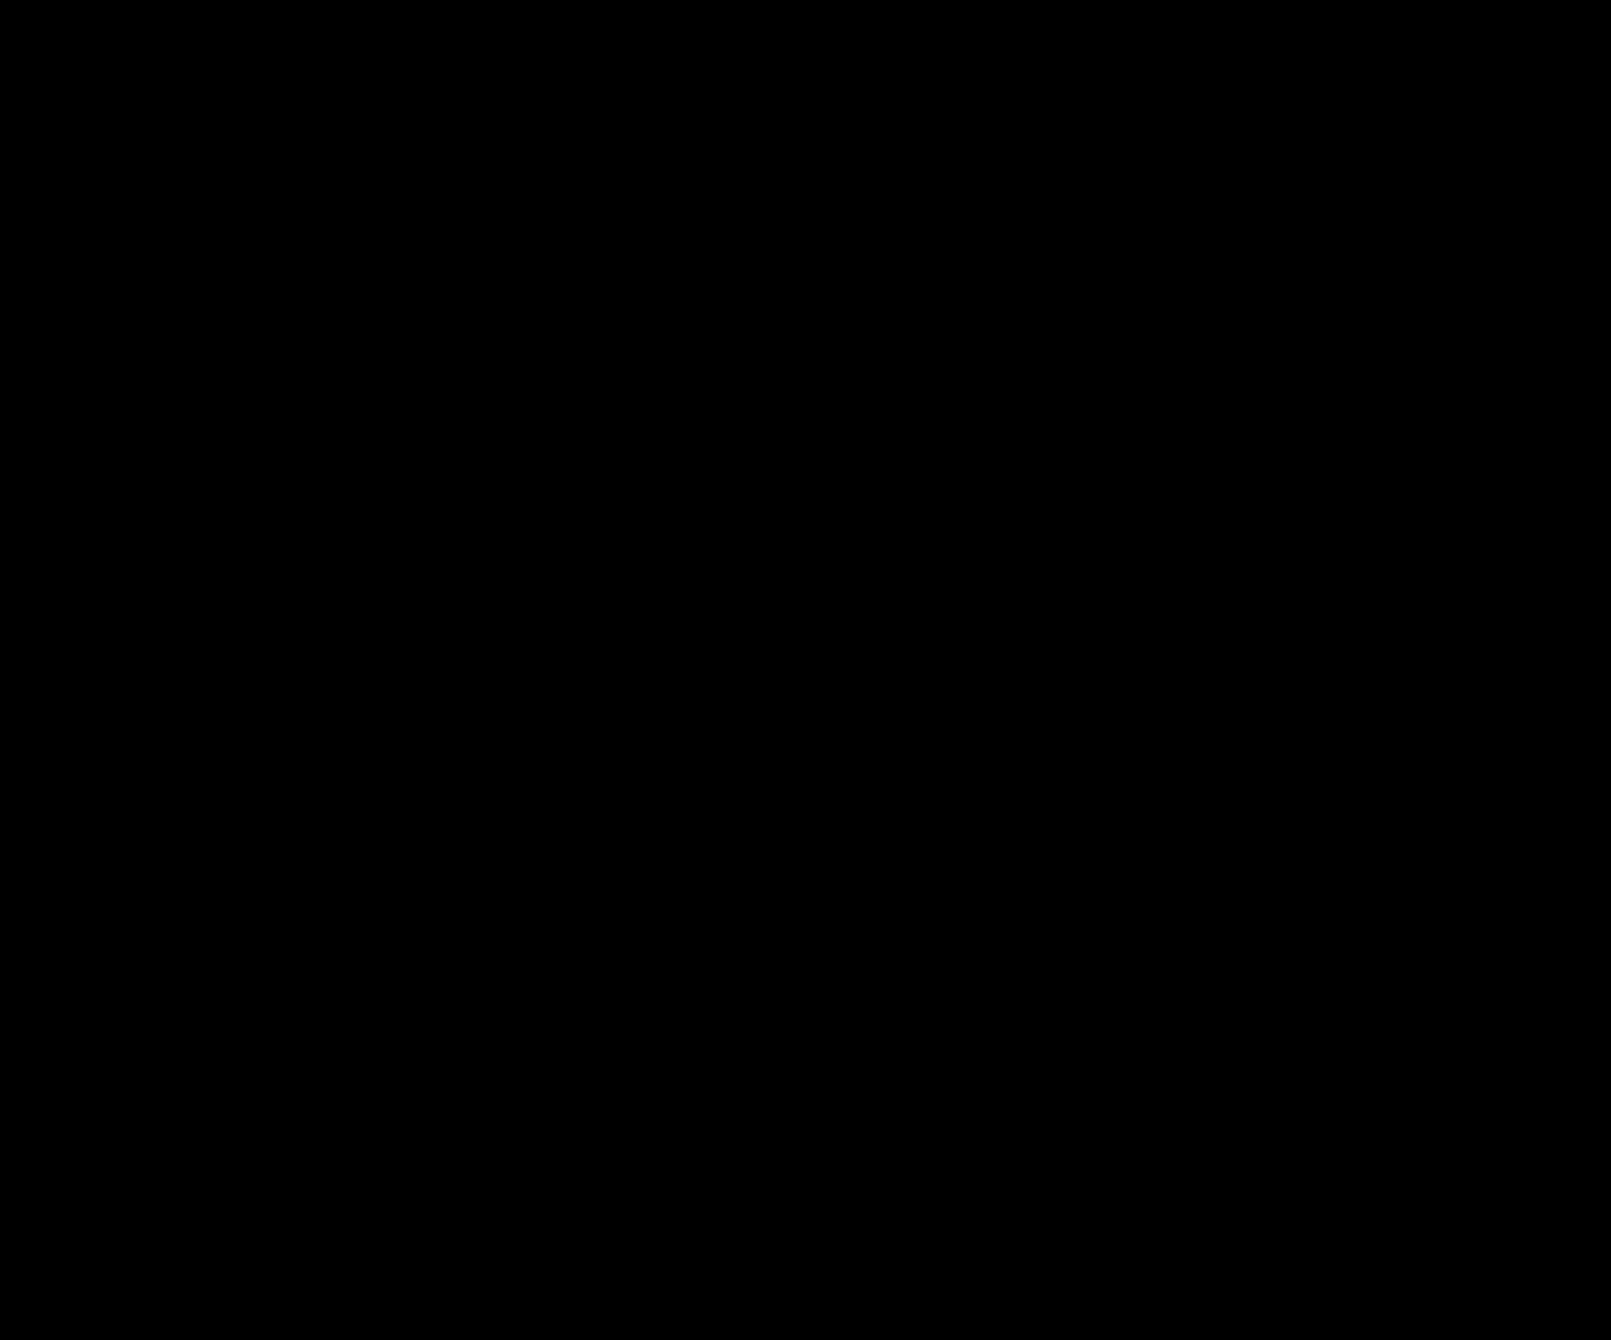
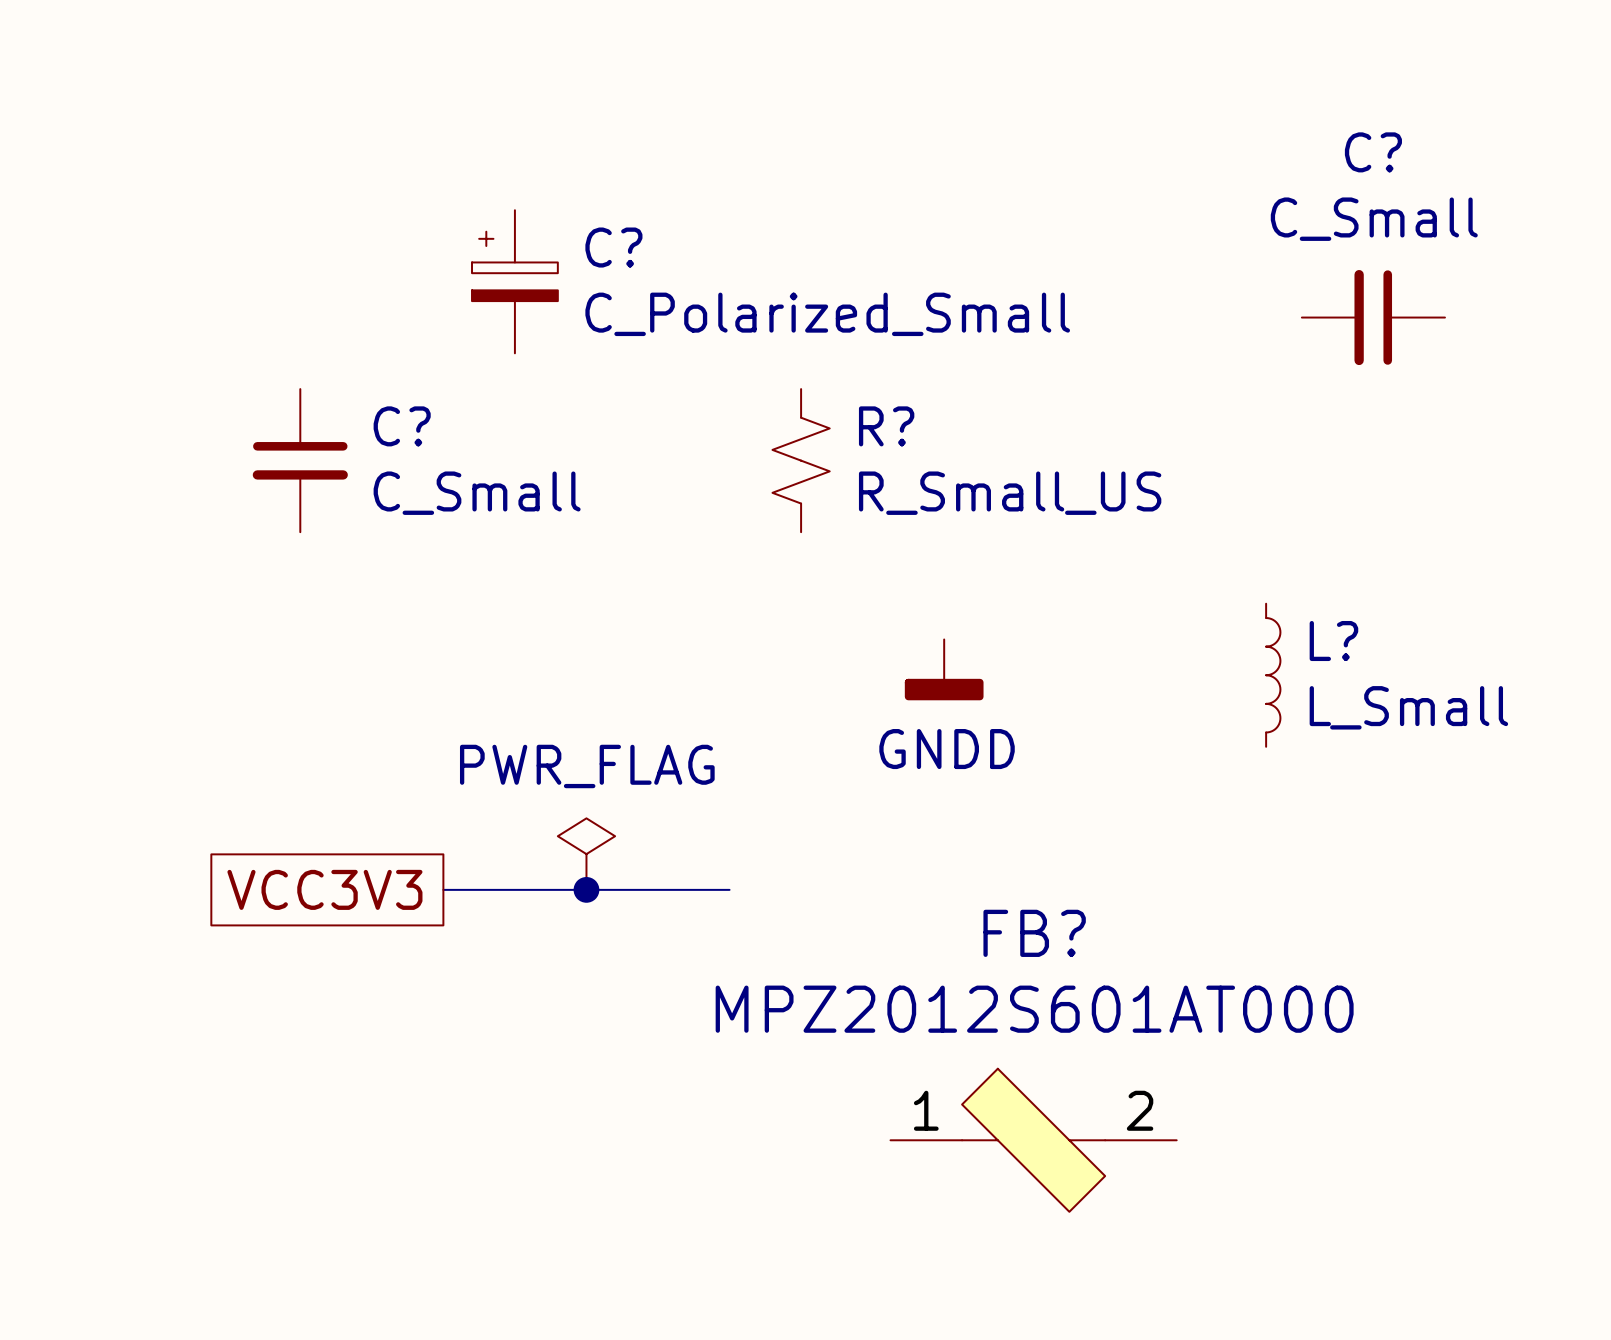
C?: none -> C_Polarized_Small (514, 281)
C?: none -> C_Small (1373, 317)
C?: none -> C_Small (300, 460)
R?: none -> R_Small_US (801, 460)
power symbol: none -> GNDD (944, 669)
L?: none -> L_Small (1273, 675)
power symbol: none -> PWR_FLAG (586, 854)
global label: none -> VCC3V3 (324, 889)
wire: none -> (443, 889) (729, 889)
junction: none -> (586, 889)
FB?: none -> MPZ2012S601AT000 (1033, 1140)

